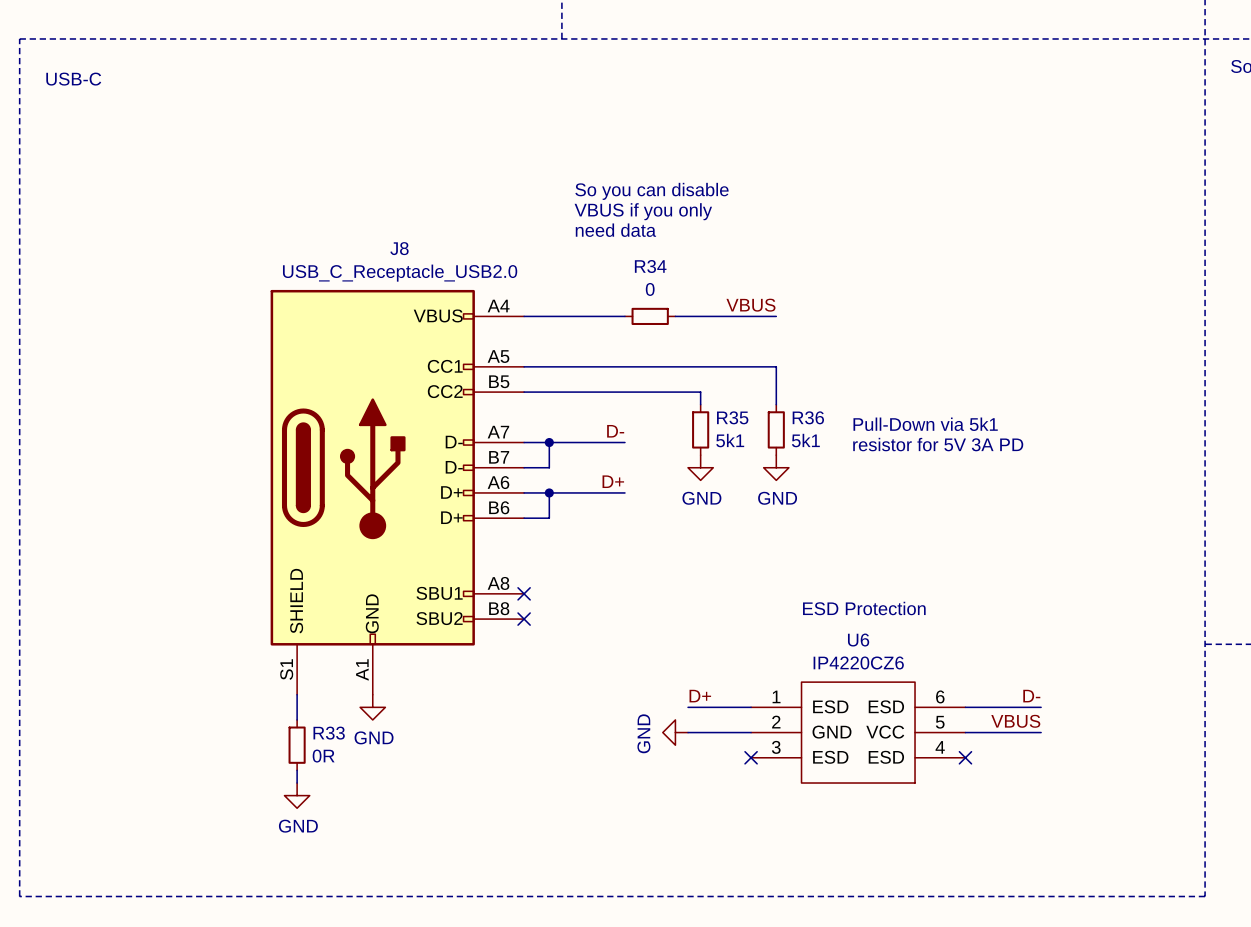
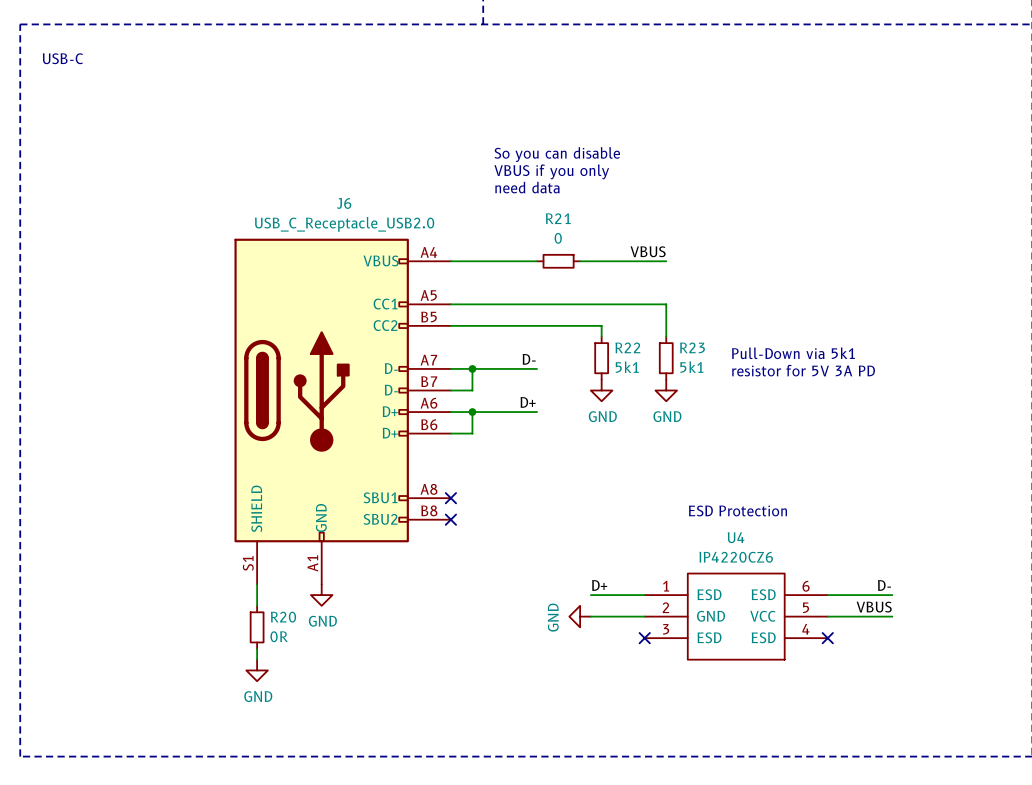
J8 name: J8 (399, 248) -> J6 (344, 203)
R34 name: R34 (650, 266) -> R21 (558, 218)
R35 name: R35 (732, 417) -> R22 (627, 347)
R36 name: R36 (808, 417) -> R23 (692, 347)
U6 name: U6 (858, 640) -> U4 (736, 537)
R33 name: R33 (329, 733) -> R20 (283, 617)

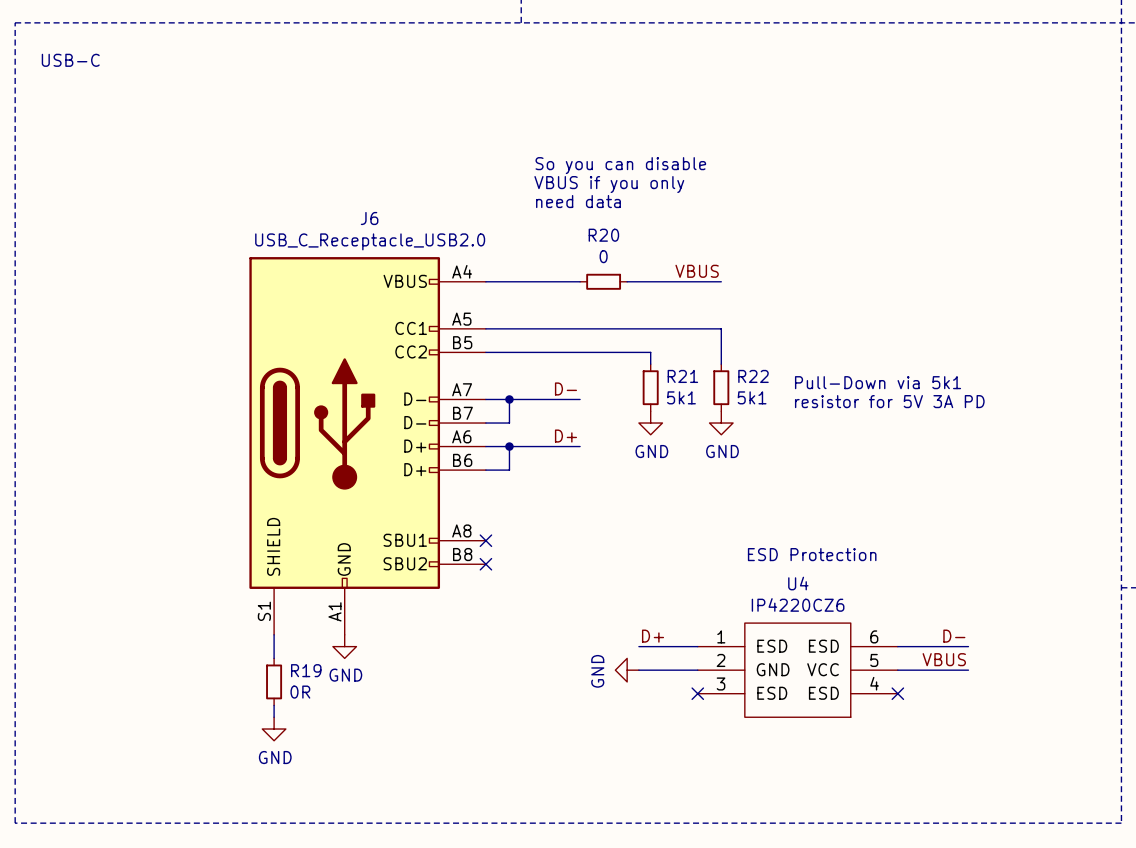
R21 name: R21 (558, 218) -> R20 (603, 235)
R22 name: R22 (627, 347) -> R21 (682, 376)
R23 name: R23 (692, 347) -> R22 (753, 376)
R20 name: R20 (283, 617) -> R19 (306, 670)

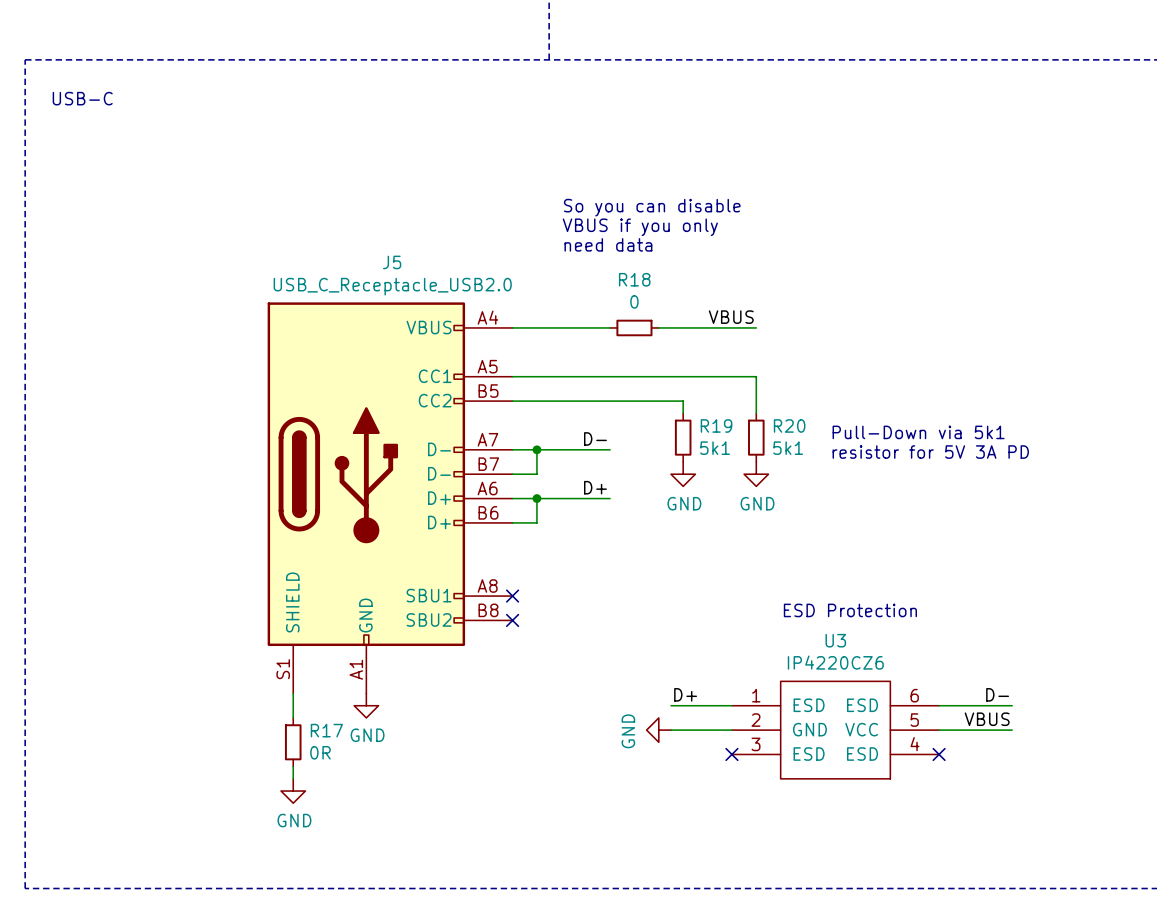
J6 name: J6 (369, 218) -> J5 (392, 262)
R20 name: R20 (603, 235) -> R18 (634, 279)
R21 name: R21 (682, 376) -> R19 (716, 425)
R22 name: R22 (753, 376) -> R20 (789, 425)
U4 name: U4 (798, 583) -> U3 (835, 640)
R19 name: R19 (306, 670) -> R17 (326, 730)

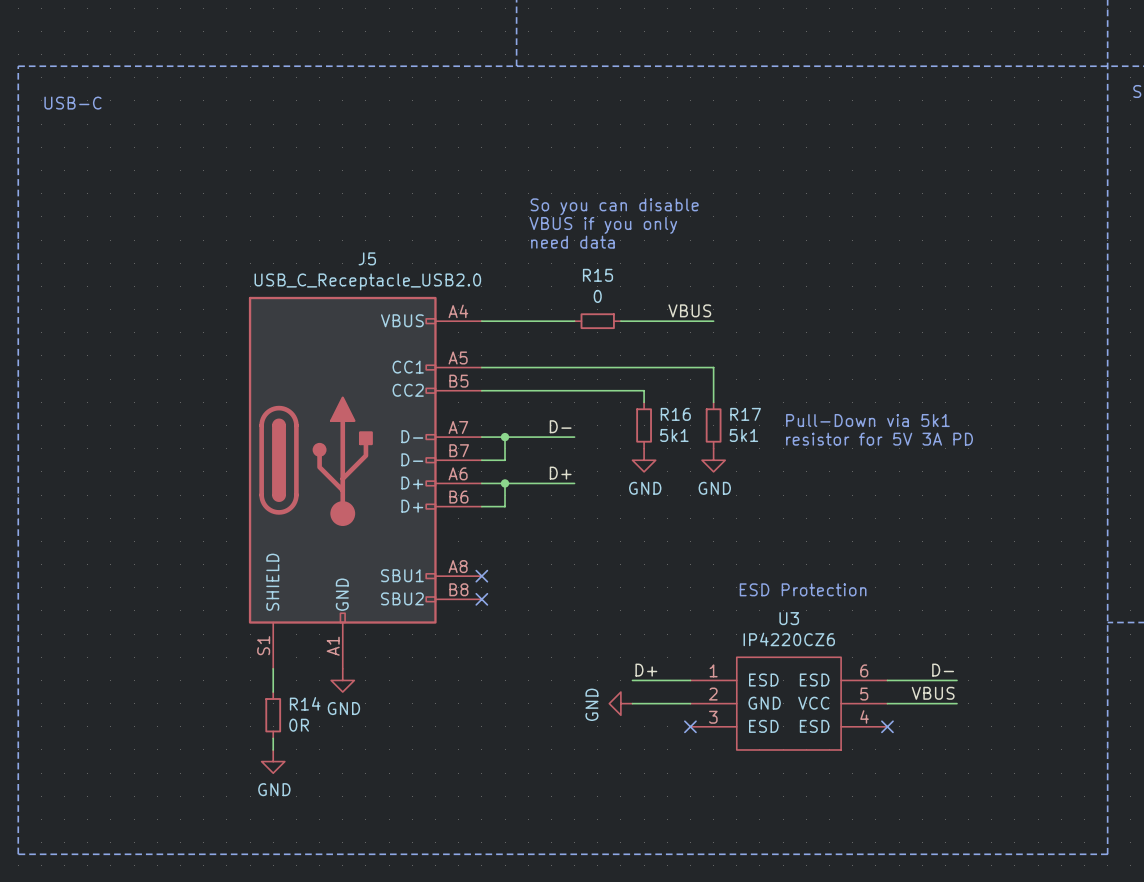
R18 name: R18 (634, 279) -> R15 (597, 275)
R19 name: R19 (716, 425) -> R16 (675, 414)
R20 name: R20 (789, 425) -> R17 (745, 414)
R17 name: R17 (326, 730) -> R14 (305, 703)

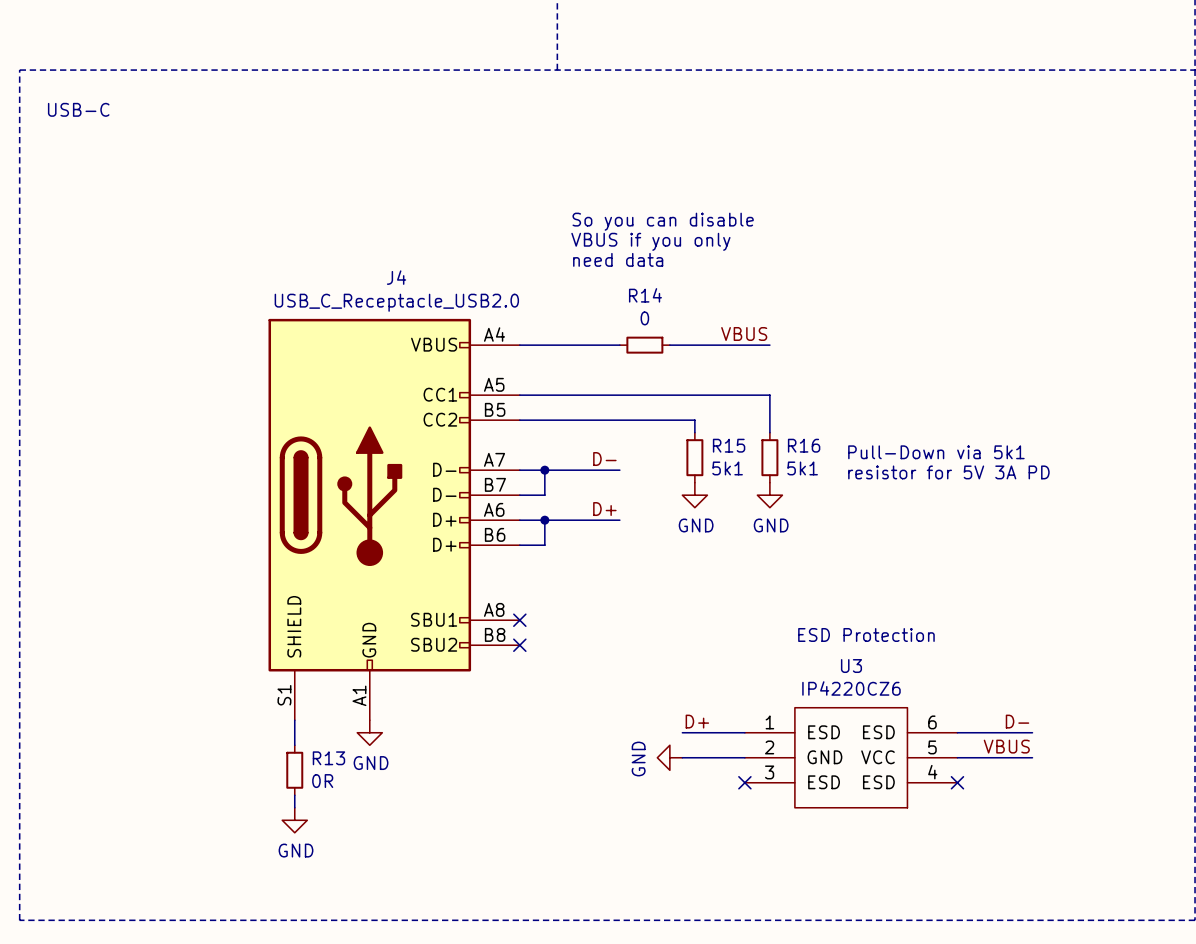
J5 name: J5 (367, 258) -> J4 (396, 277)
R15 name: R15 (597, 275) -> R14 (645, 295)
R16 name: R16 (675, 414) -> R15 (729, 445)
R17 name: R17 (745, 414) -> R16 (804, 445)
R14 name: R14 (305, 703) -> R13 (328, 758)

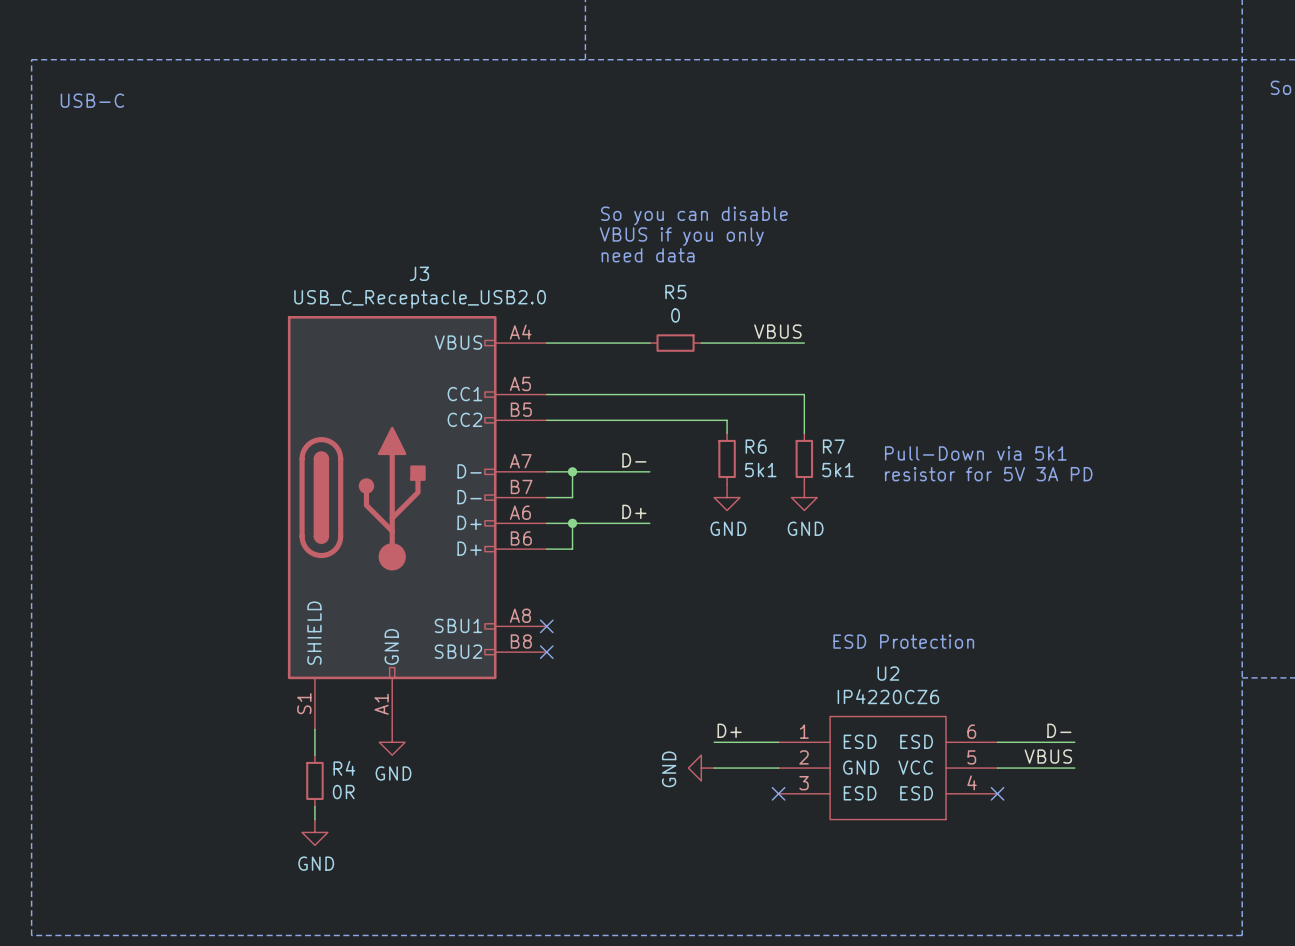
J4 name: J4 (396, 277) -> J3 (419, 273)
R14 name: R14 (645, 295) -> R5 (675, 292)
R15 name: R15 (729, 445) -> R6 (756, 446)
R16 name: R16 (804, 445) -> R7 (833, 446)
U3 name: U3 (851, 666) -> U2 (888, 673)
R13 name: R13 (328, 758) -> R4 (344, 768)

